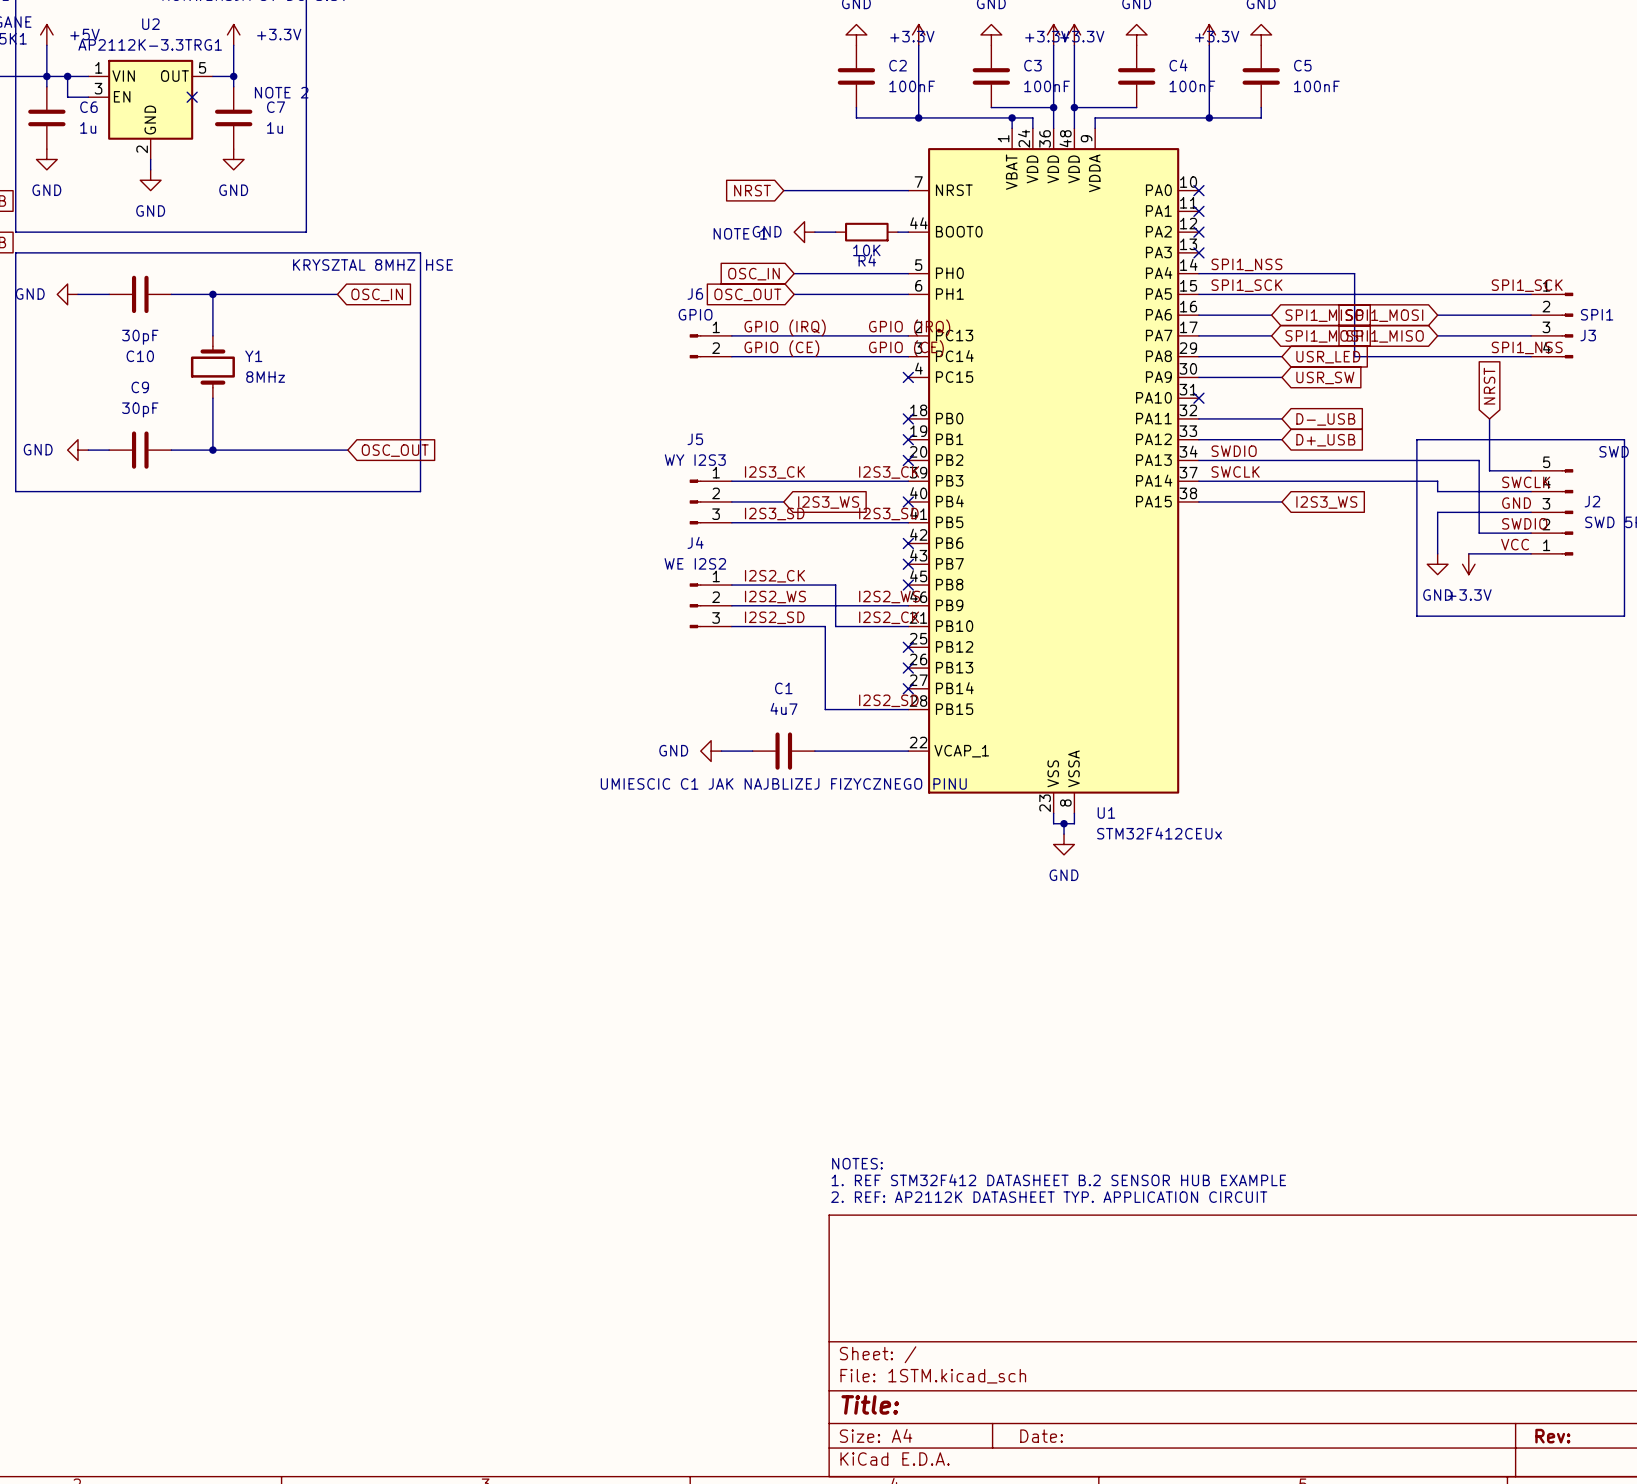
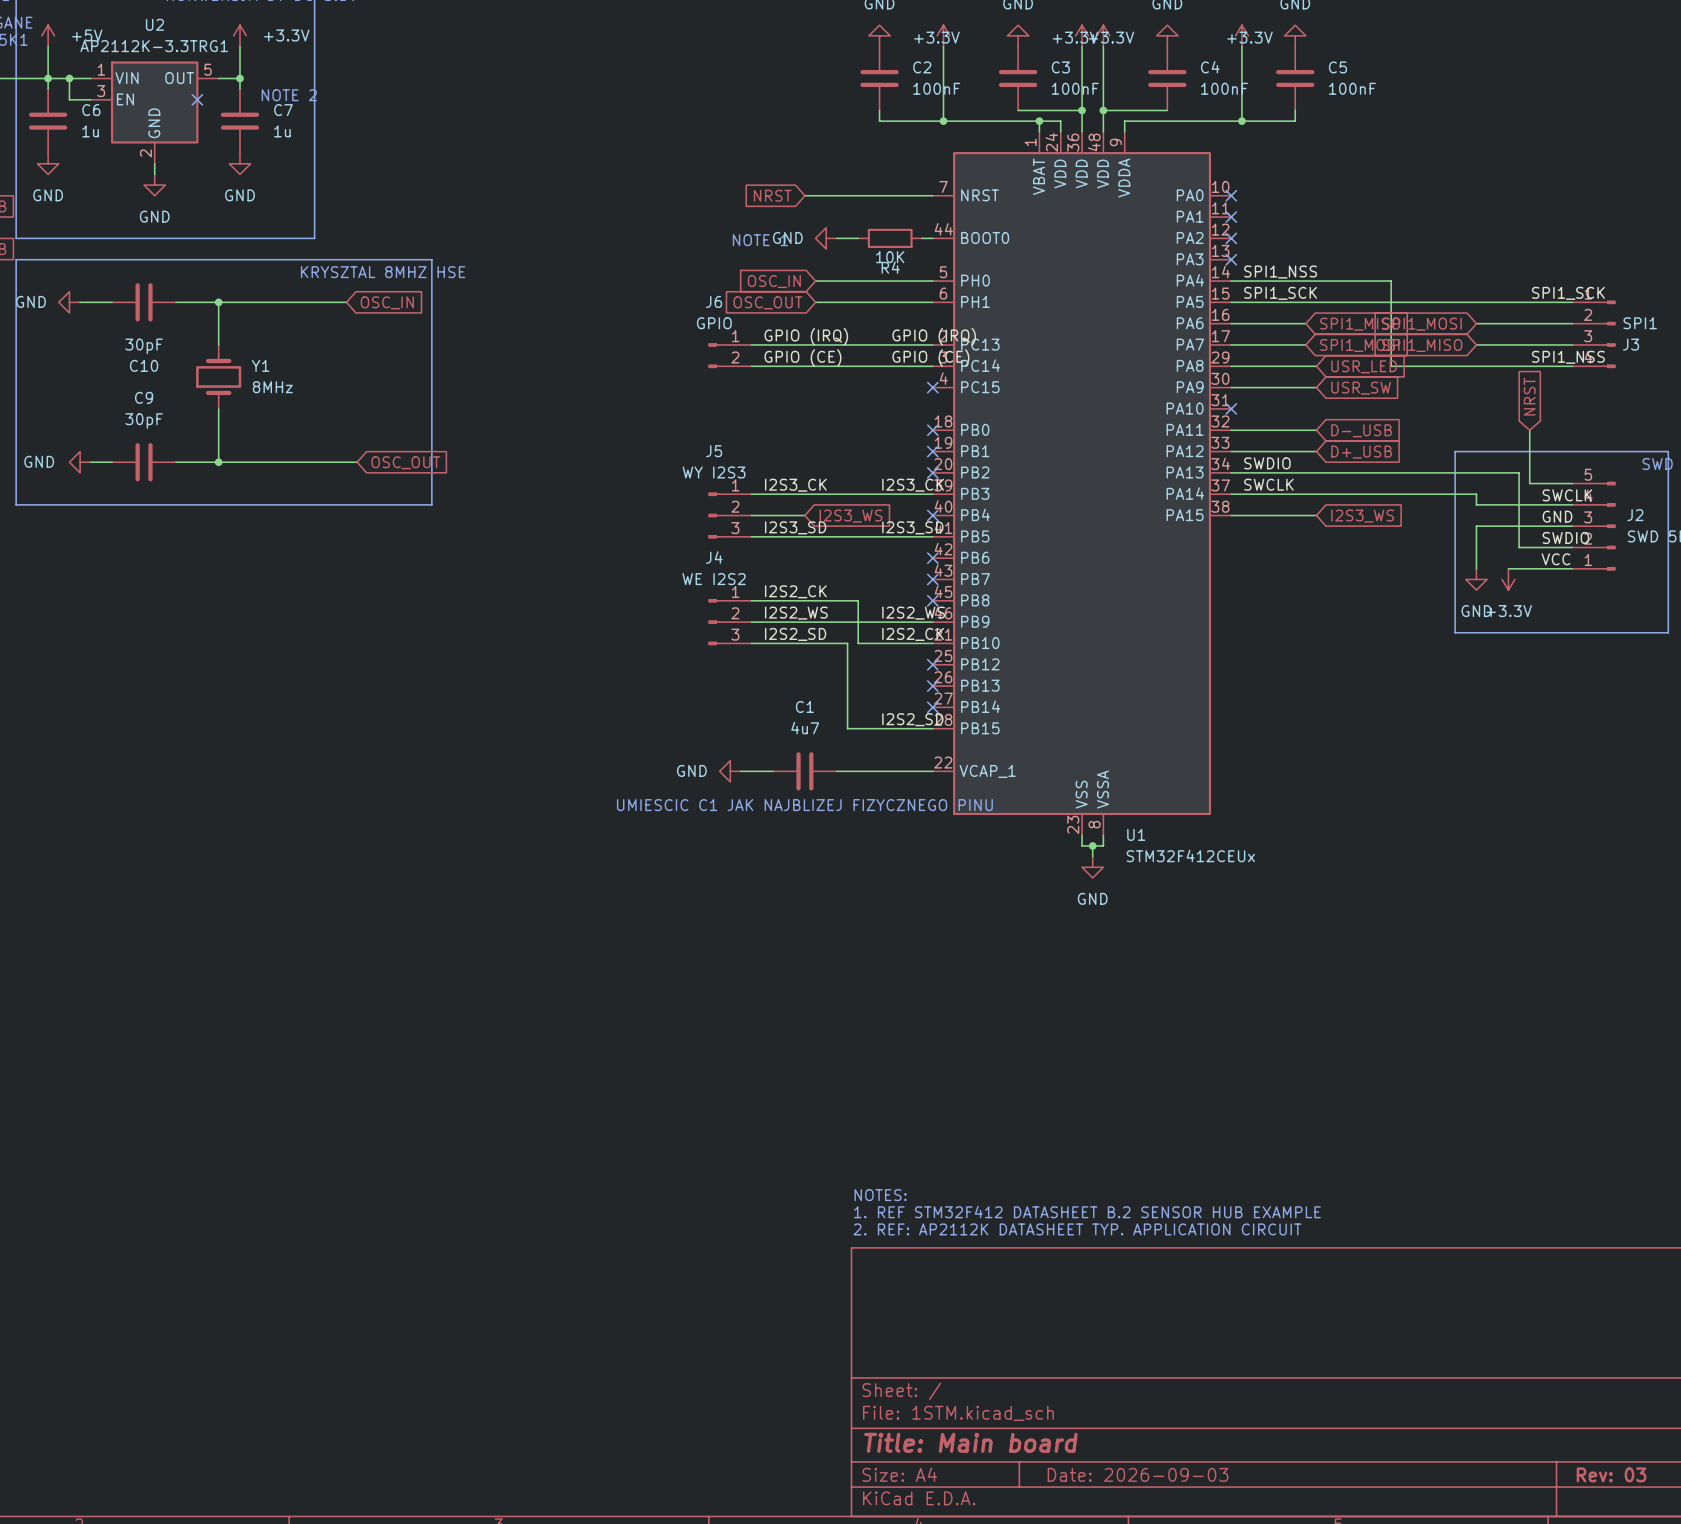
title block: Title: (870, 1404) -> Title: Main board (970, 1442)
title block: Date: (1041, 1436) -> Date: 2026-09-03 (1138, 1474)
title block: Rev: (1552, 1436) -> Rev: 03 (1611, 1474)

